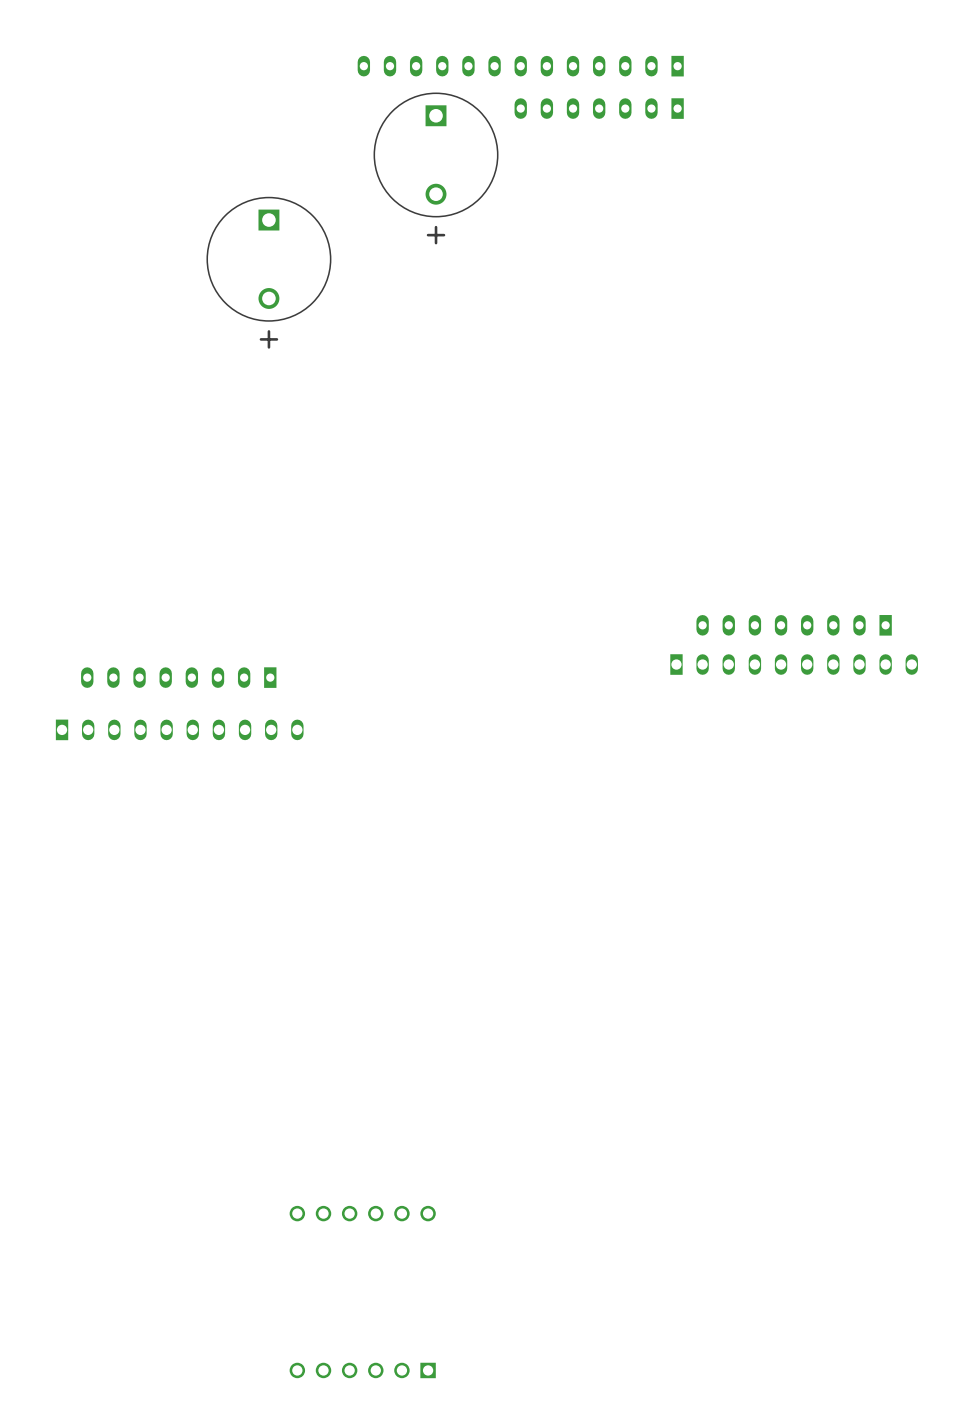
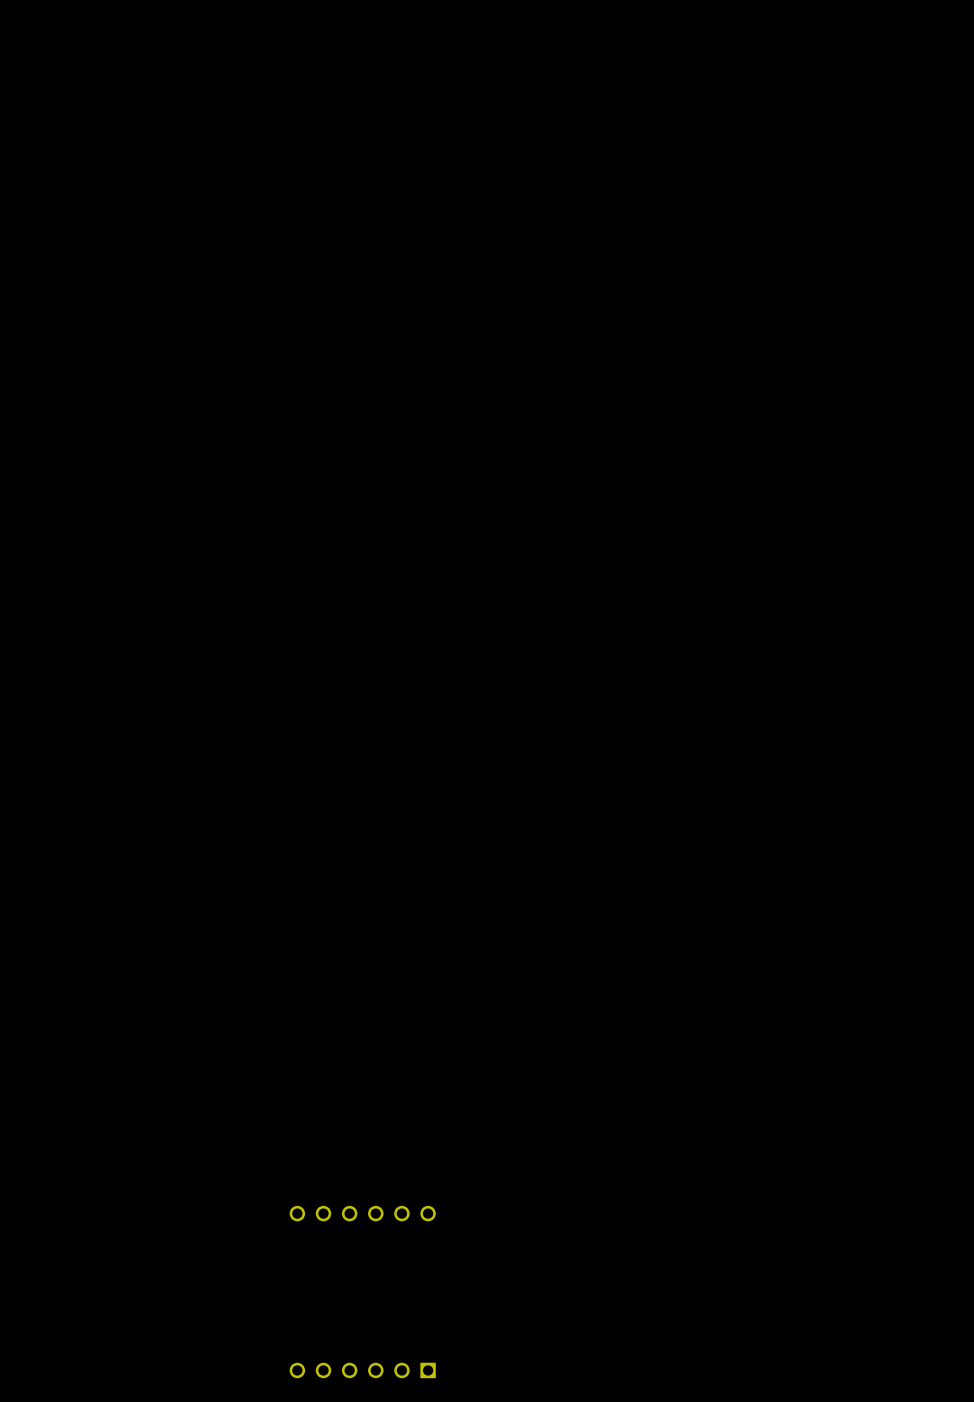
part: (520, 66) -> none
part: (599, 108) -> none
part: (436, 154) -> none
part: (268, 259) -> none
part: (794, 625) -> none
part: (794, 664) -> none
part: (178, 677) -> none
part: (179, 729) -> none

